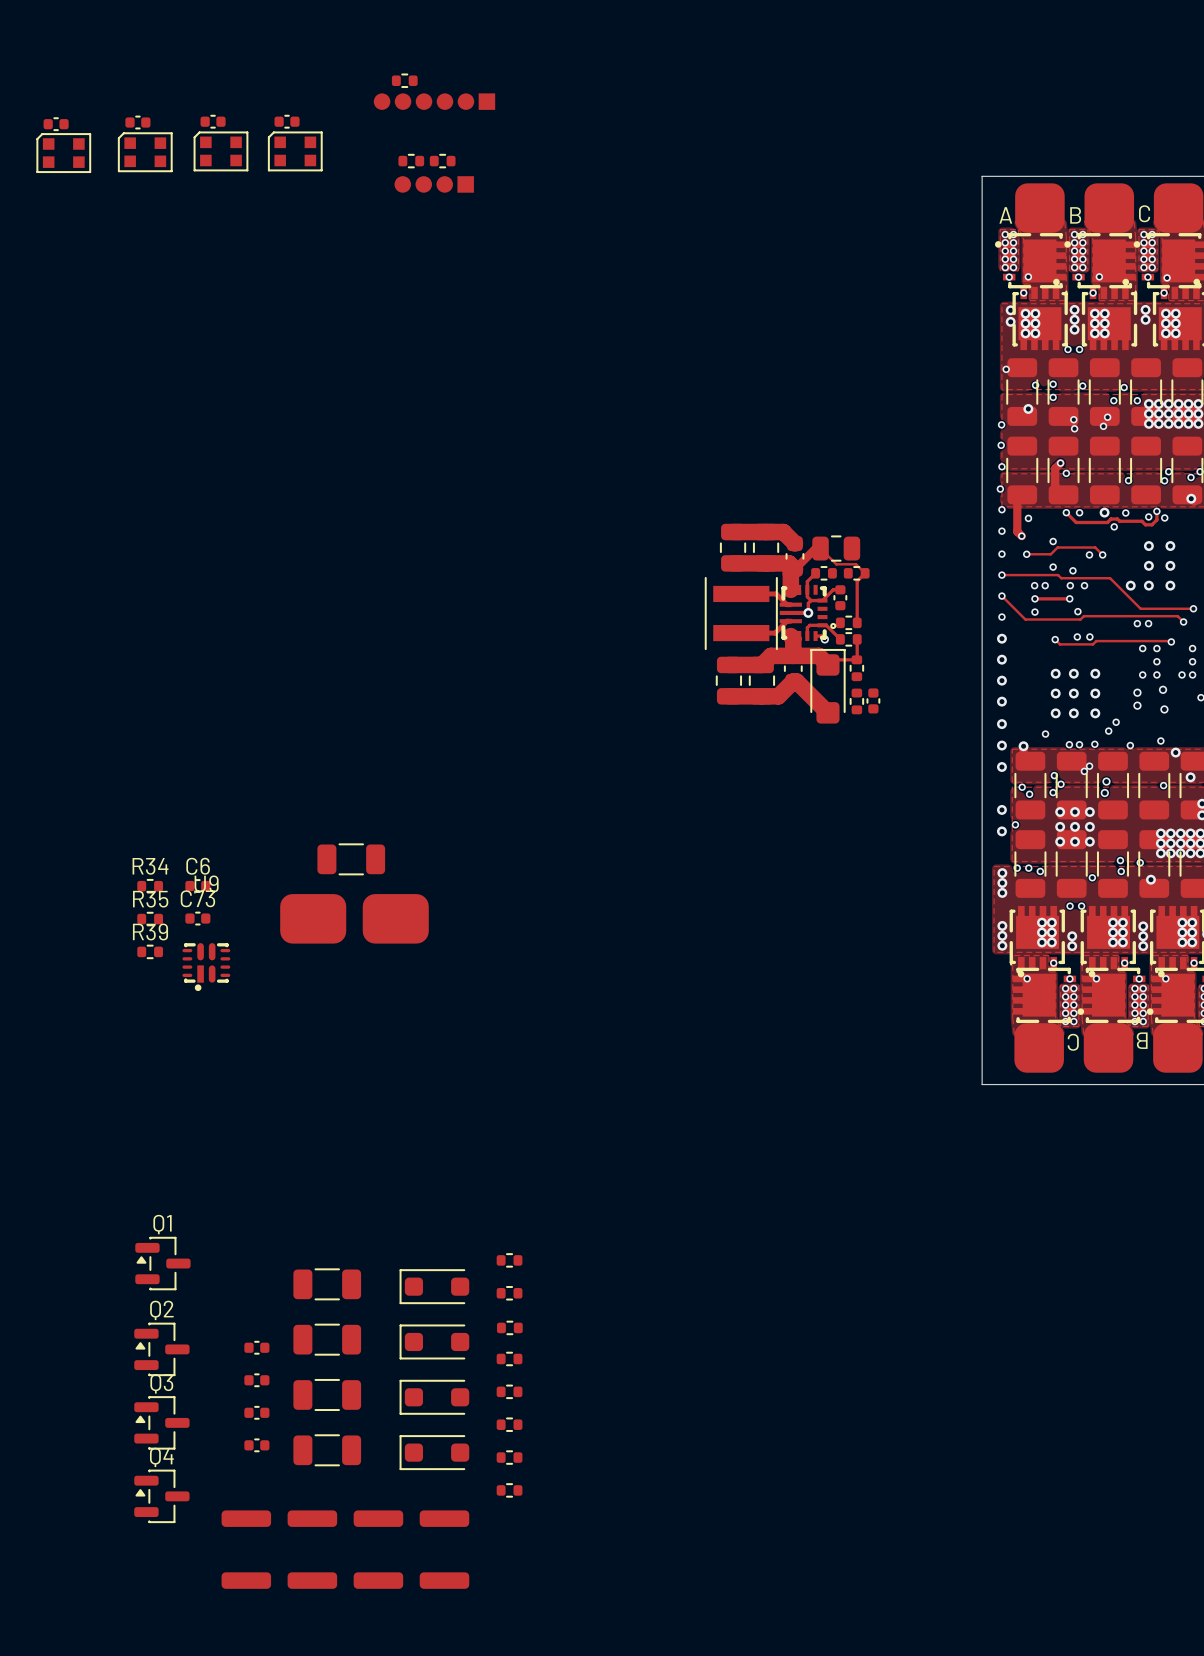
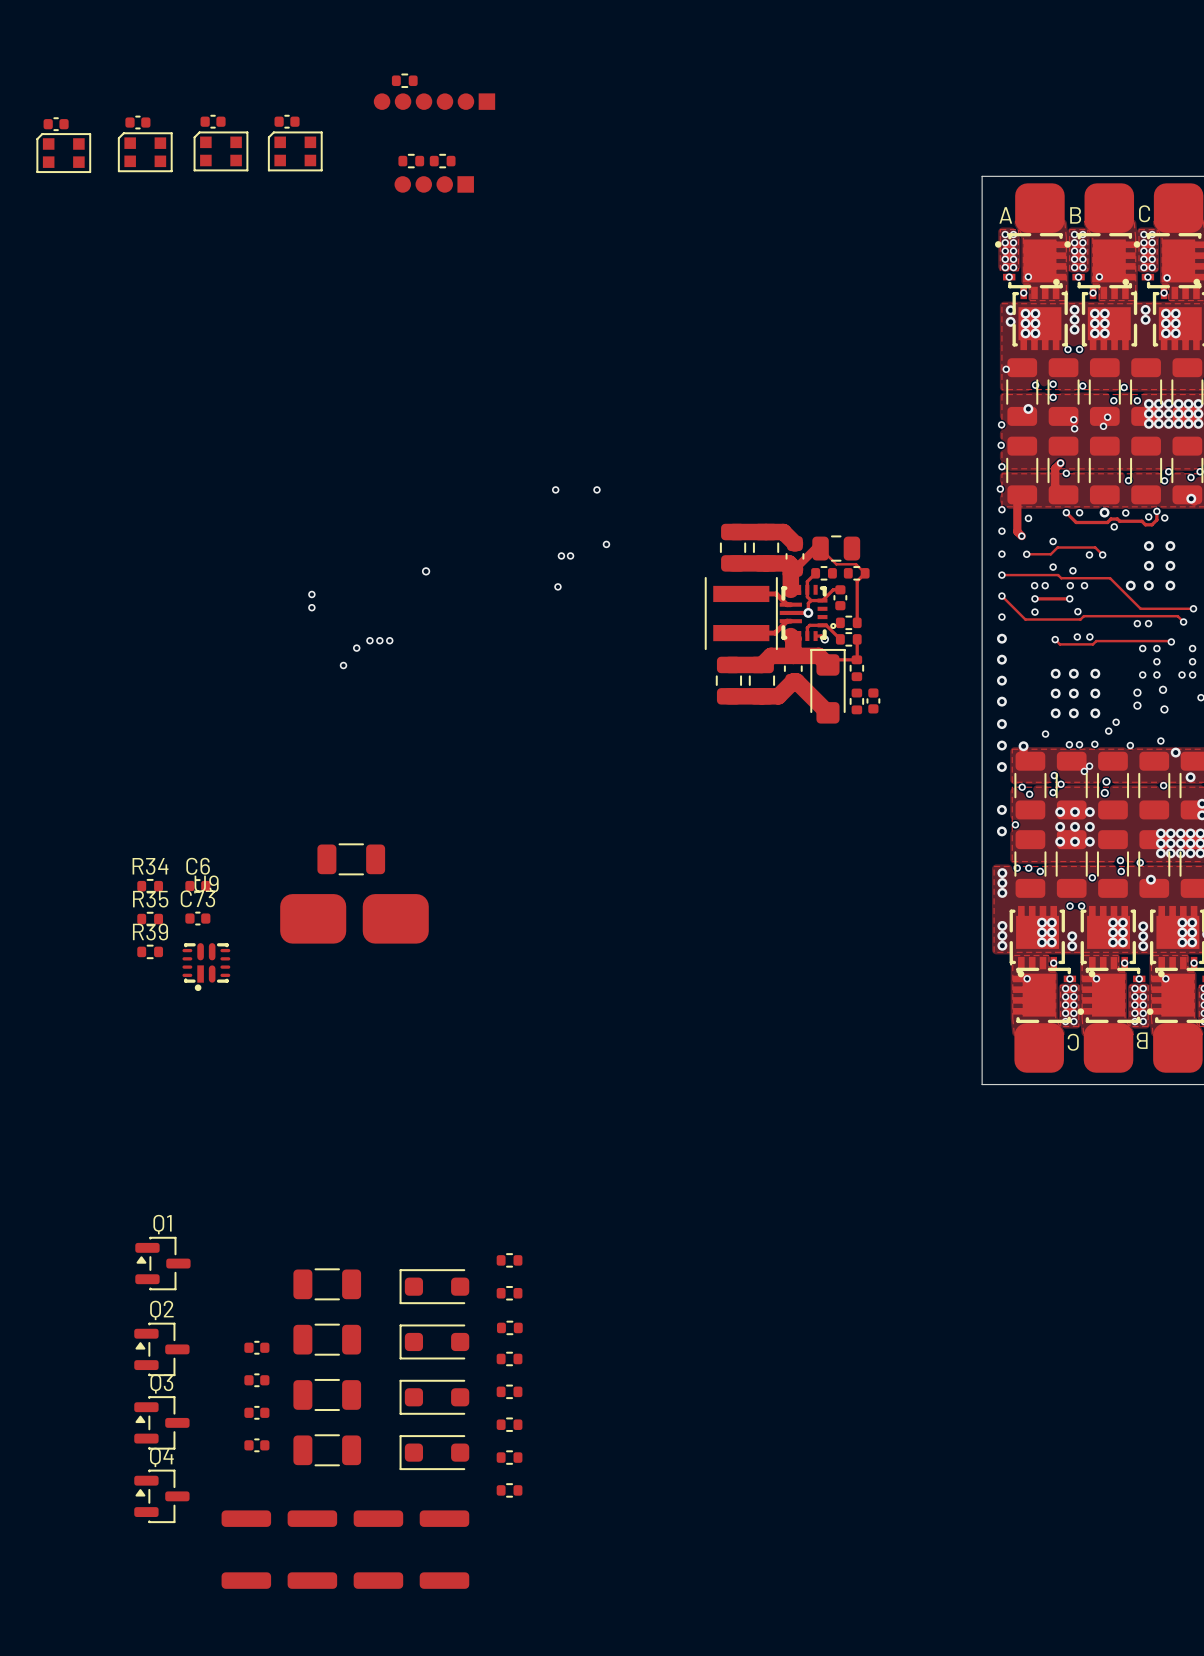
via: none -> (555, 489)
via: none -> (596, 489)
via: none -> (606, 544)
via: none -> (561, 555)
via: none -> (570, 555)
via: none -> (426, 571)
via: none -> (557, 586)
via: none -> (311, 594)
via: none -> (311, 607)
via: none -> (369, 640)
via: none -> (379, 640)
via: none -> (389, 640)
via: none -> (356, 648)
via: none -> (343, 665)

